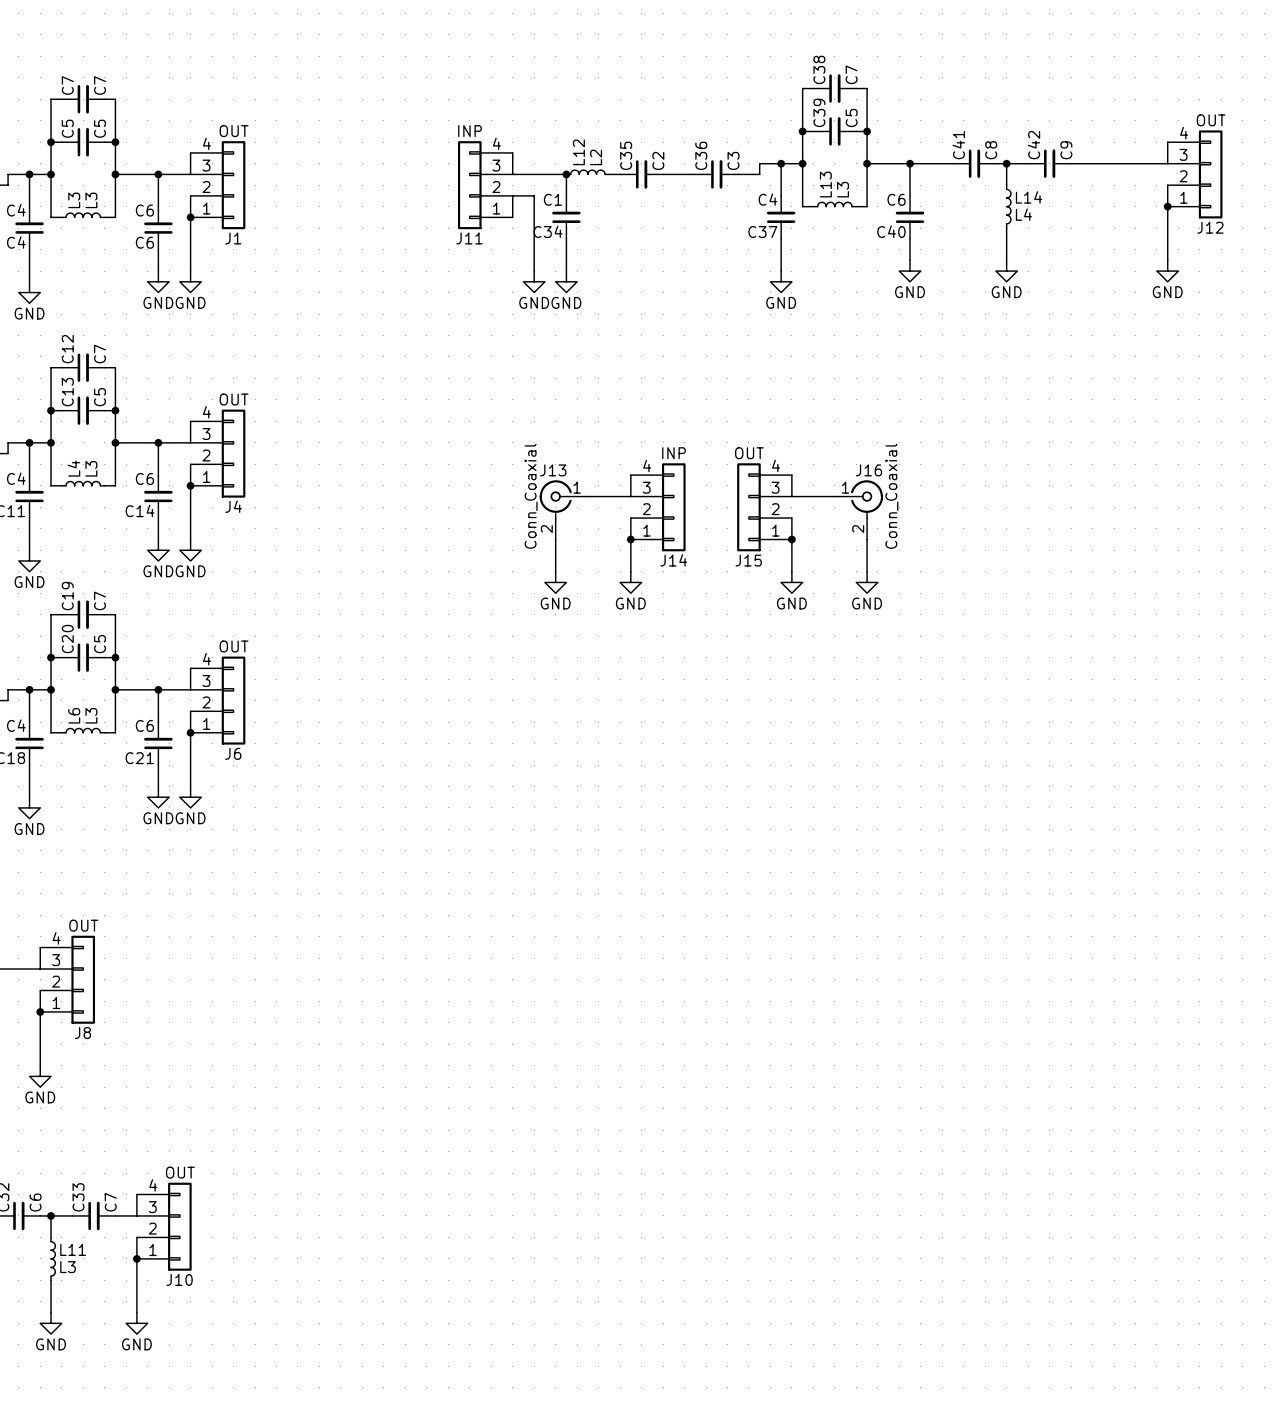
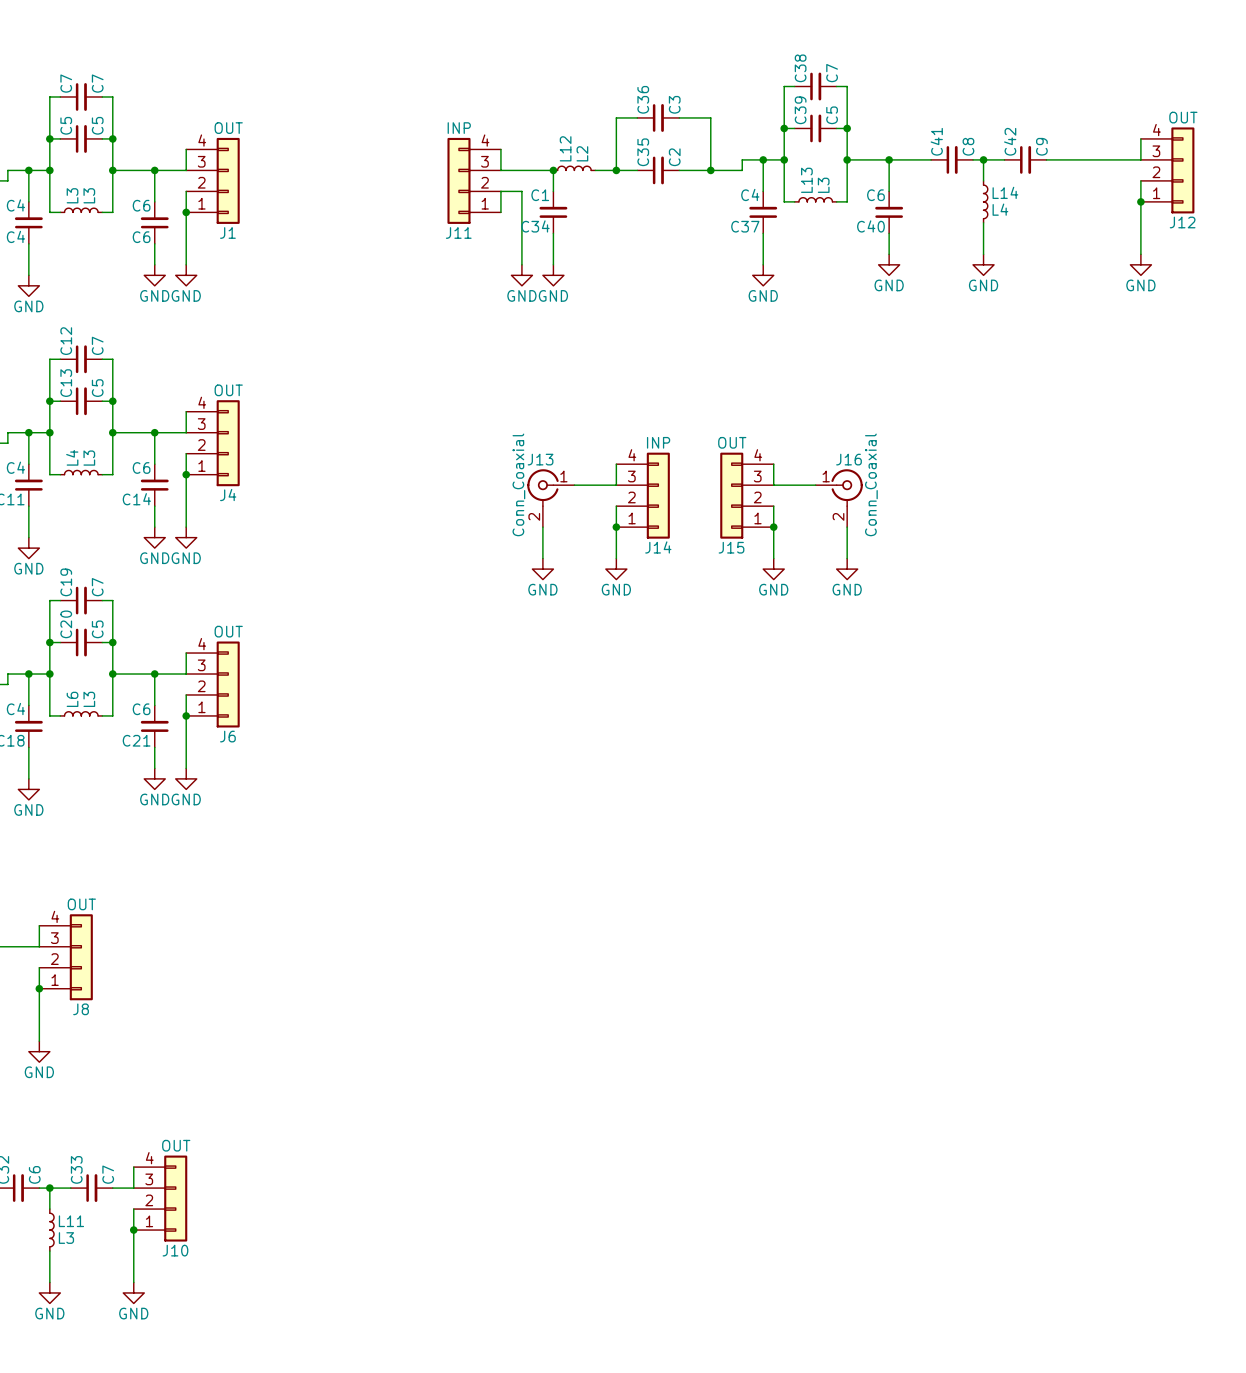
wire: none -> (637, 117) (616, 117) (616, 170)
wire: none -> (679, 117) (710, 117) (710, 170)
junction: none -> (616, 170)
C35 position: (641, 174) -> (658, 170)
C36 position: (716, 174) -> (658, 117)
junction: none -> (710, 170)

